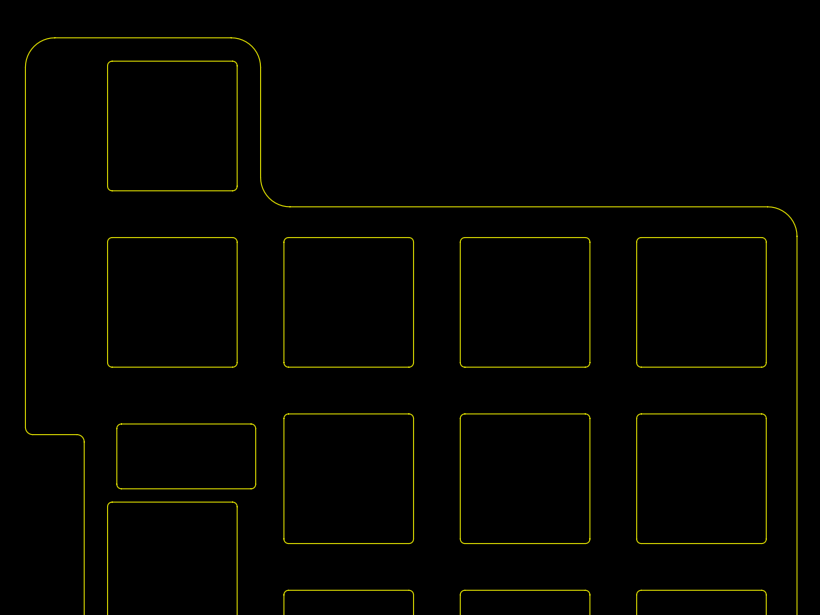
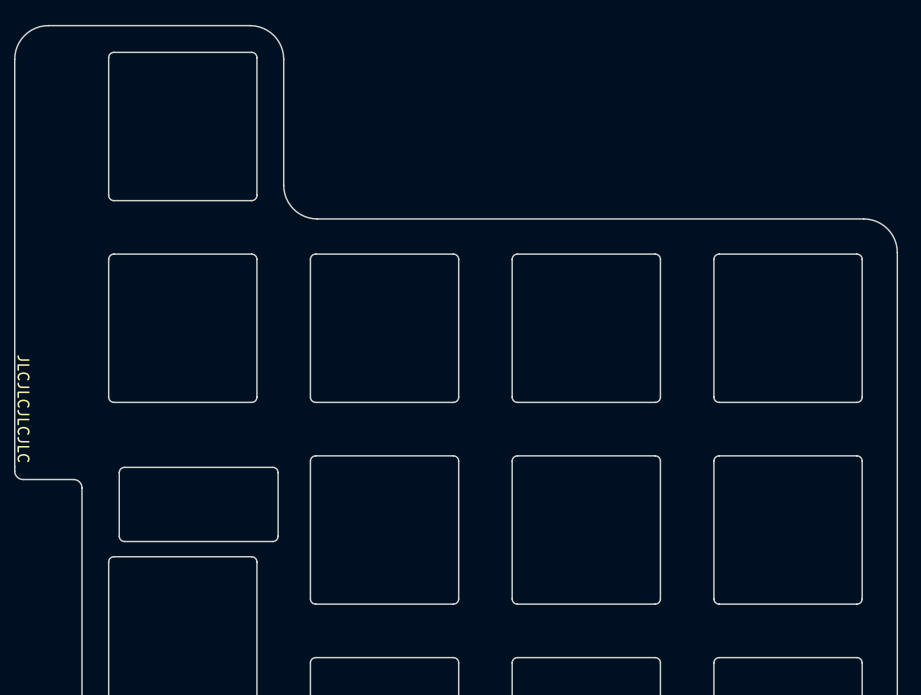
text: none -> JLCJLCJLCJLC (23, 408)

